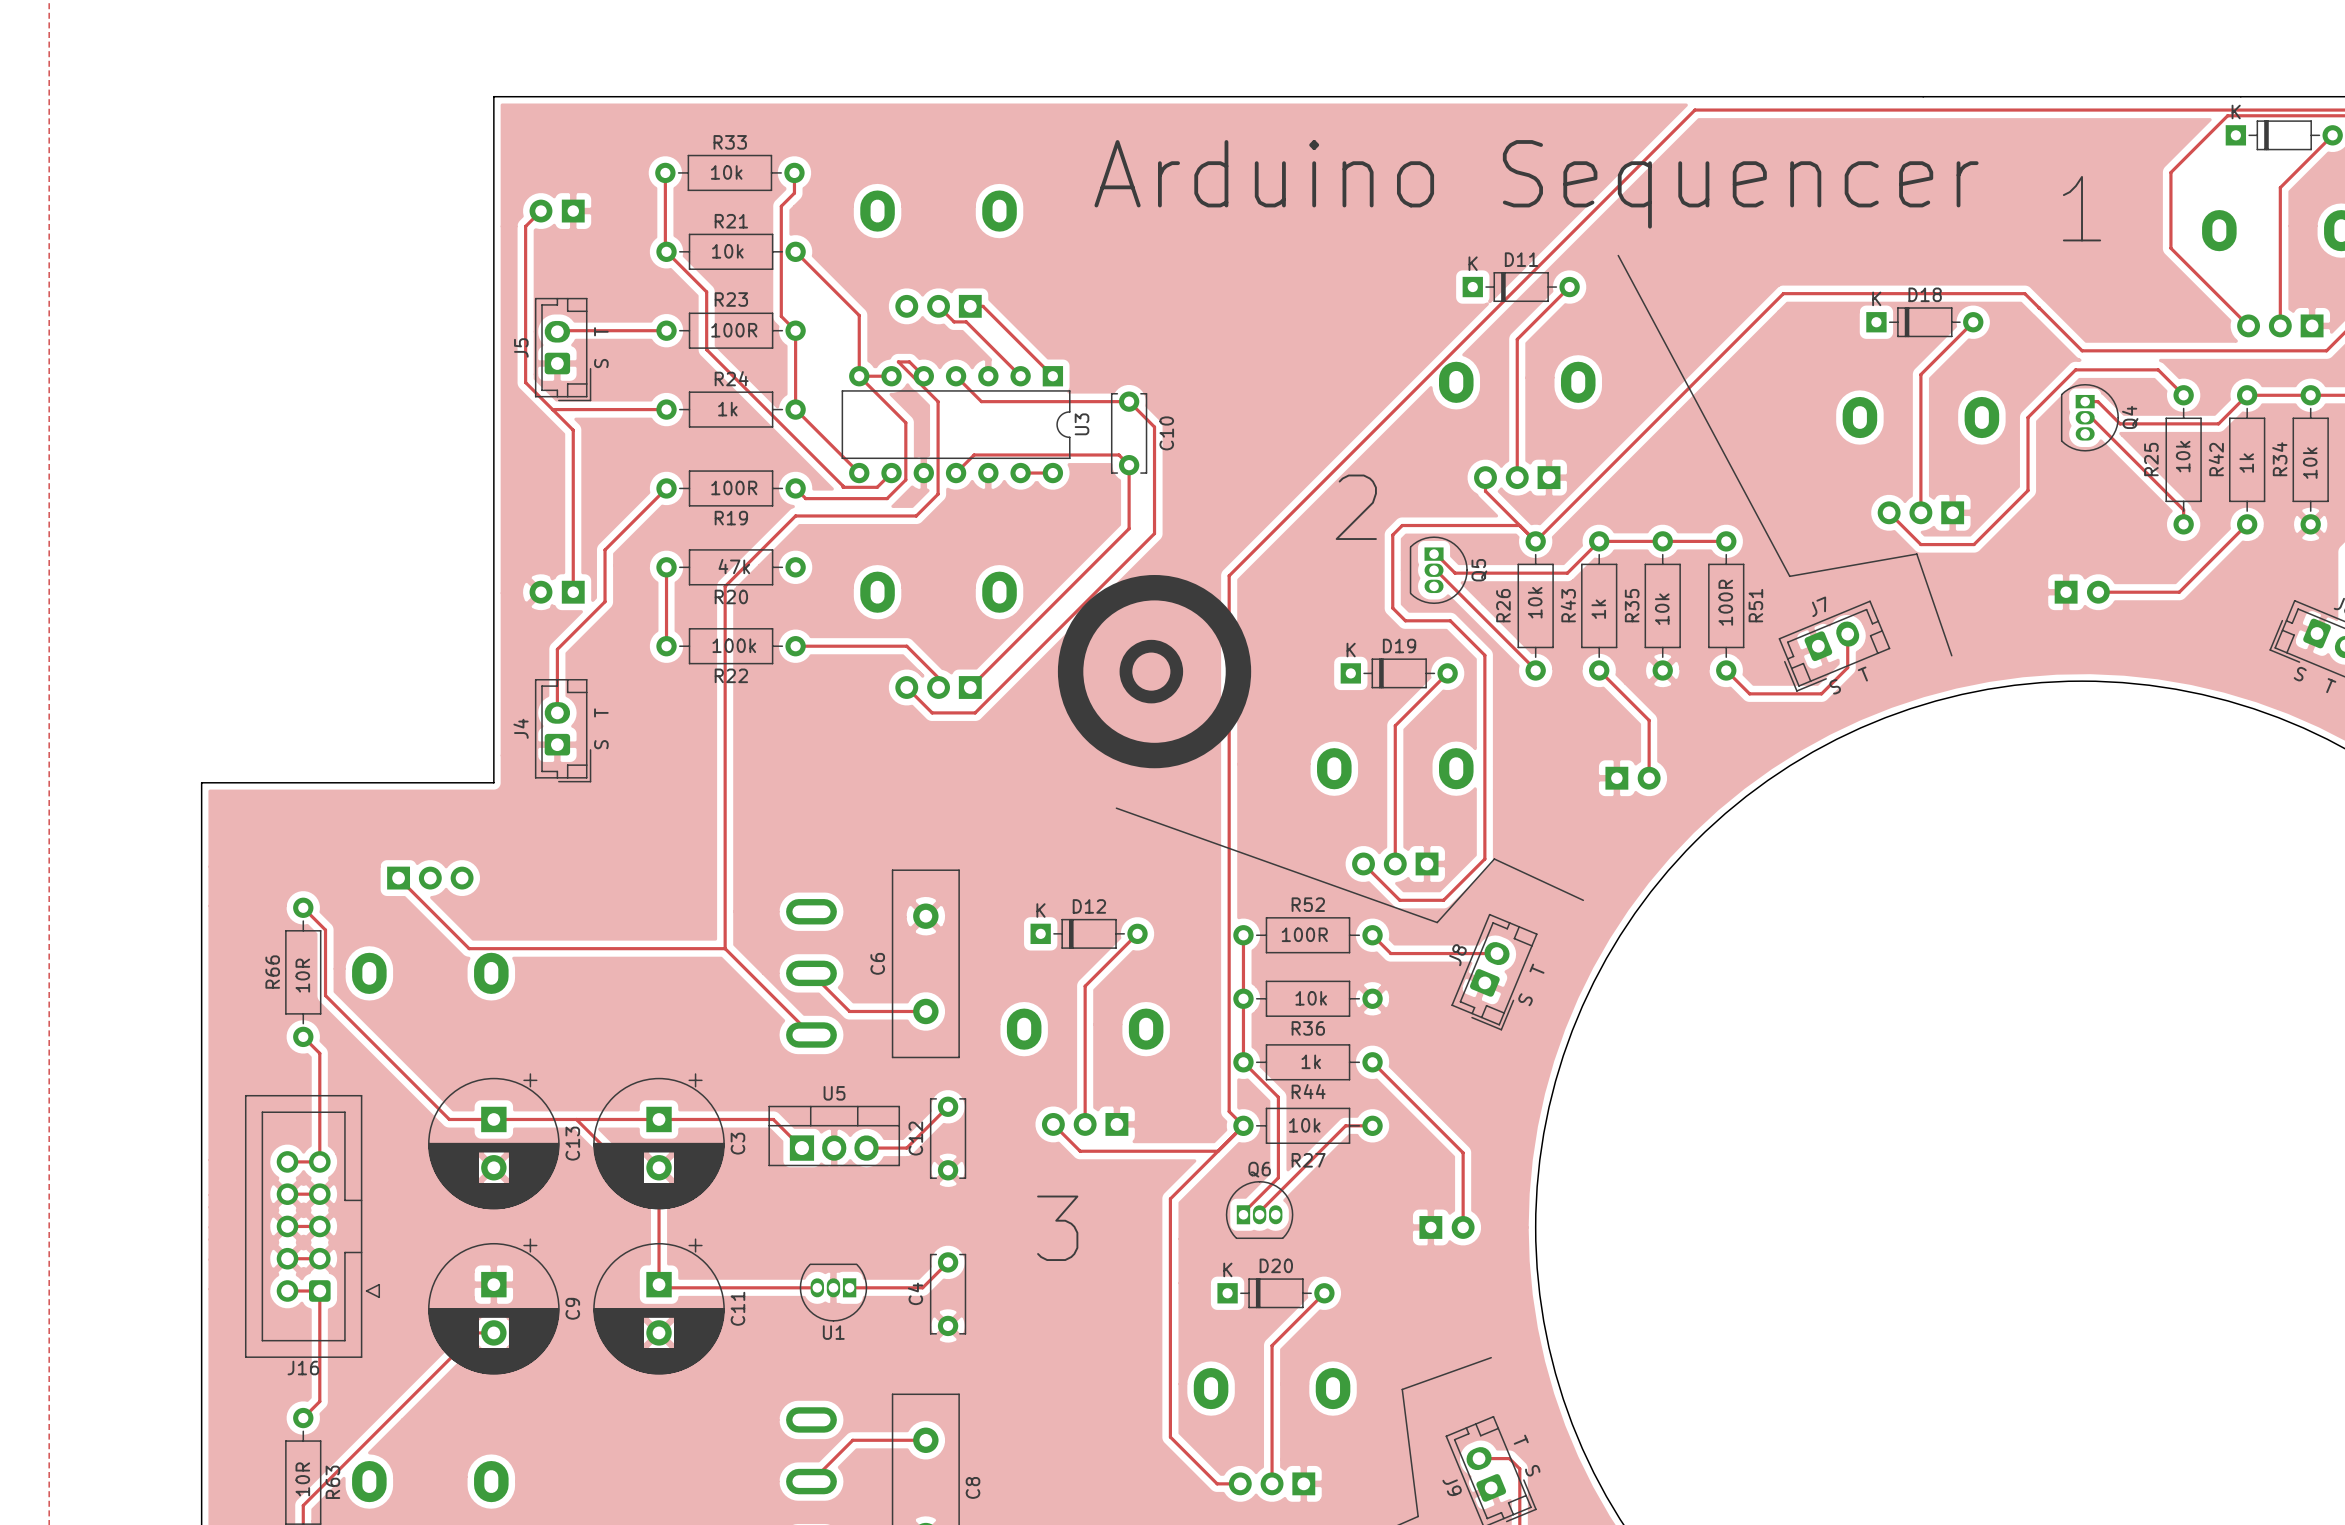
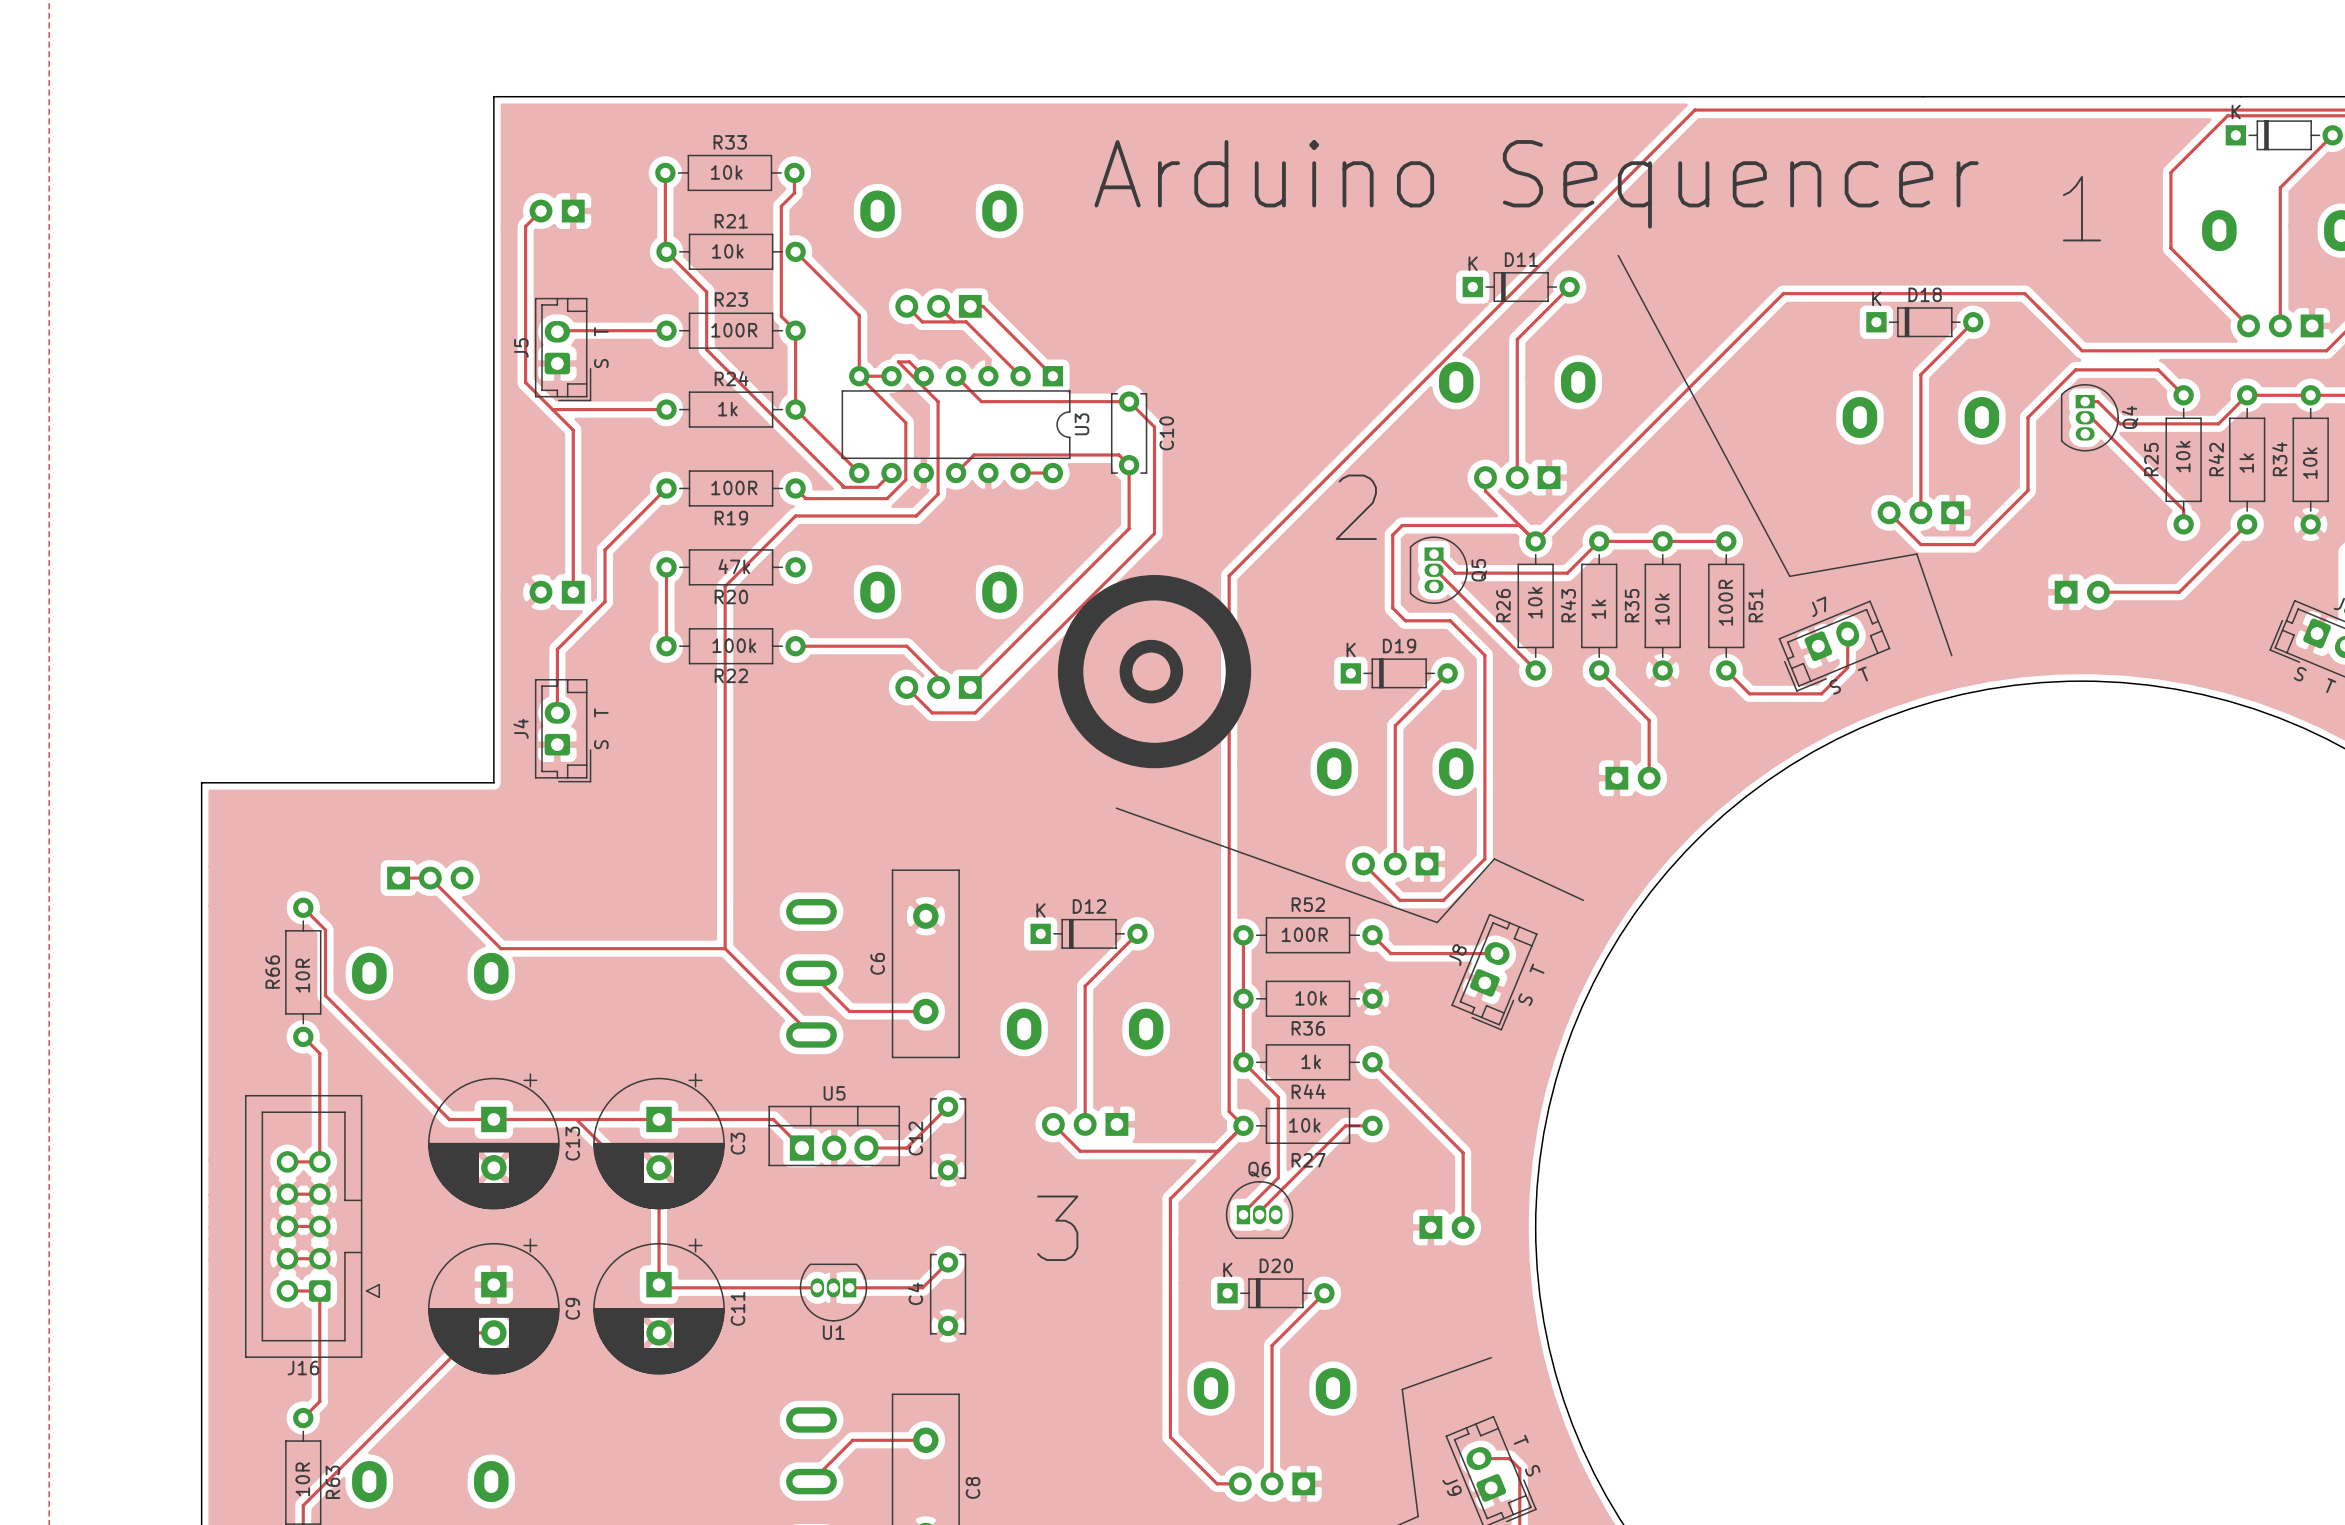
track: none -> (906, 306) (922, 321) (954, 321)
track: (398, 878) (469, 948) (500, 948) -> (398, 878) (430, 878) (500, 948)

